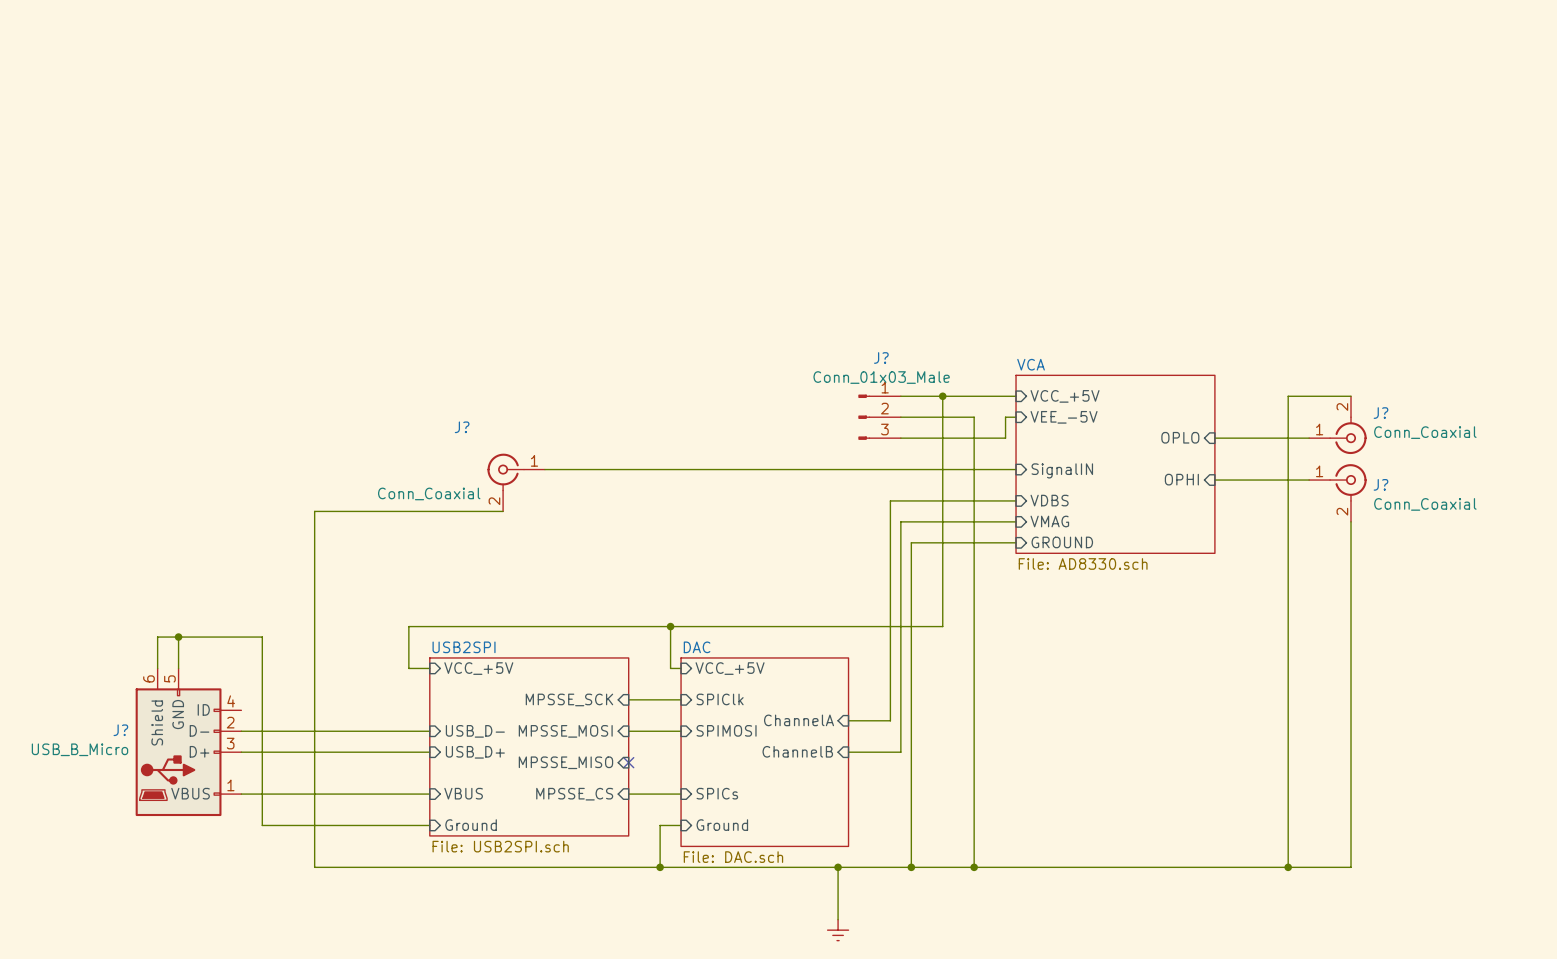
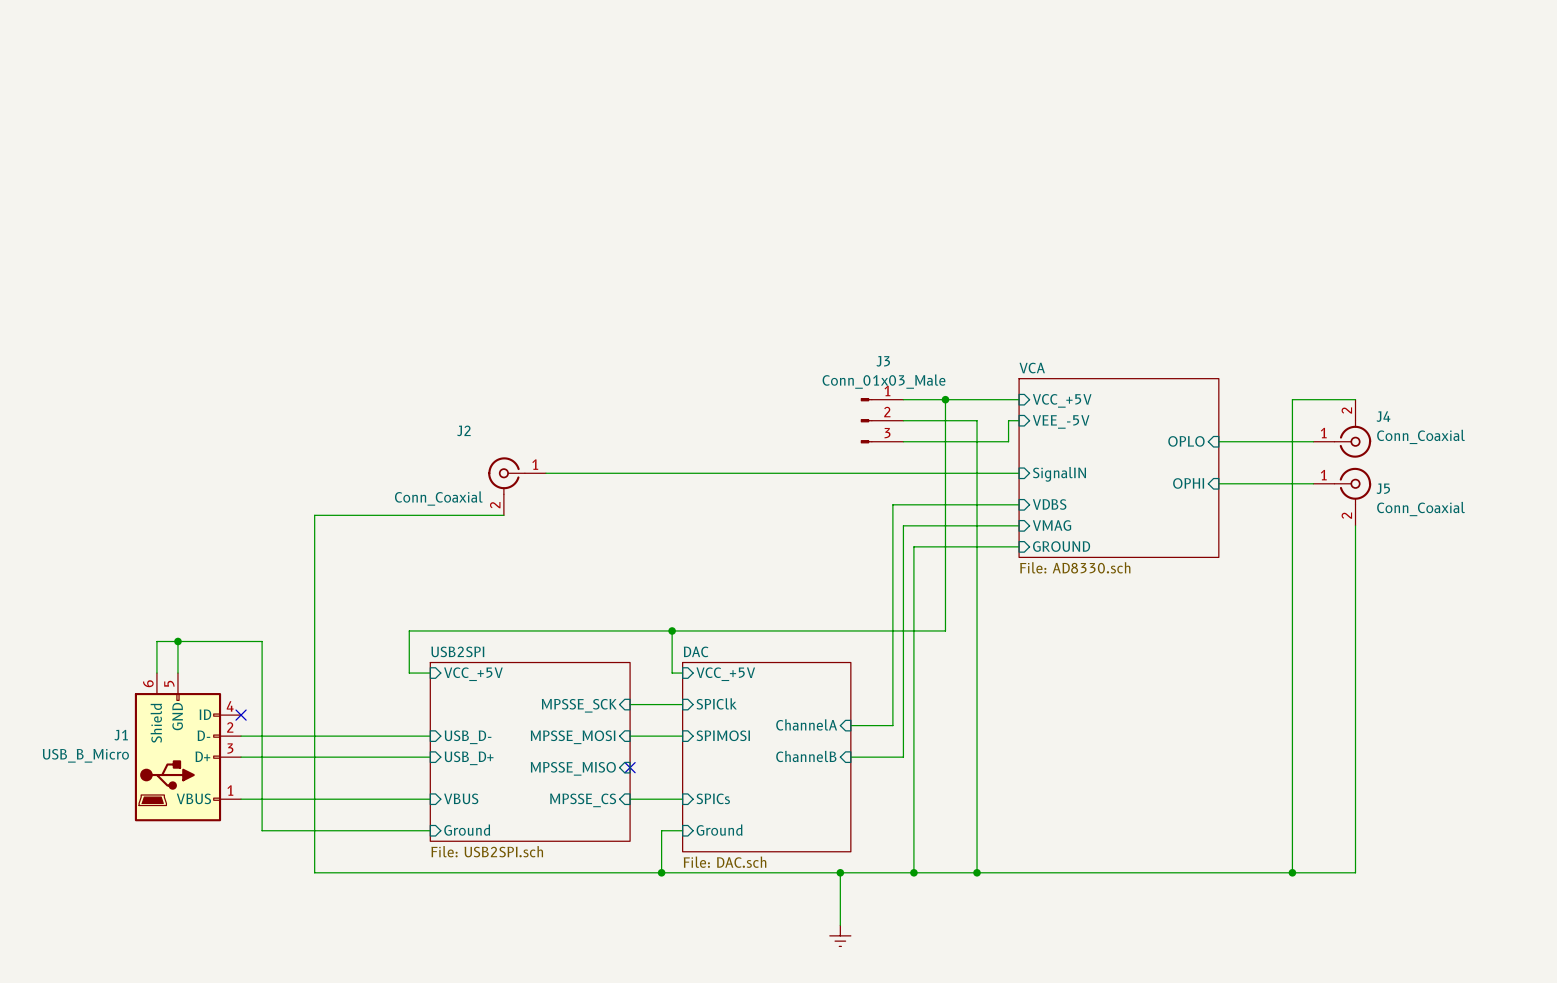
J? name: J? (881, 357) -> J3 (883, 361)
J? name: J? (1380, 413) -> J4 (1383, 416)
J? name: J? (462, 427) -> J2 (463, 430)
J? name: J? (1380, 484) -> J5 (1383, 488)
no-connect mark: none -> (241, 715)
J? name: J? (120, 730) -> J1 (121, 735)

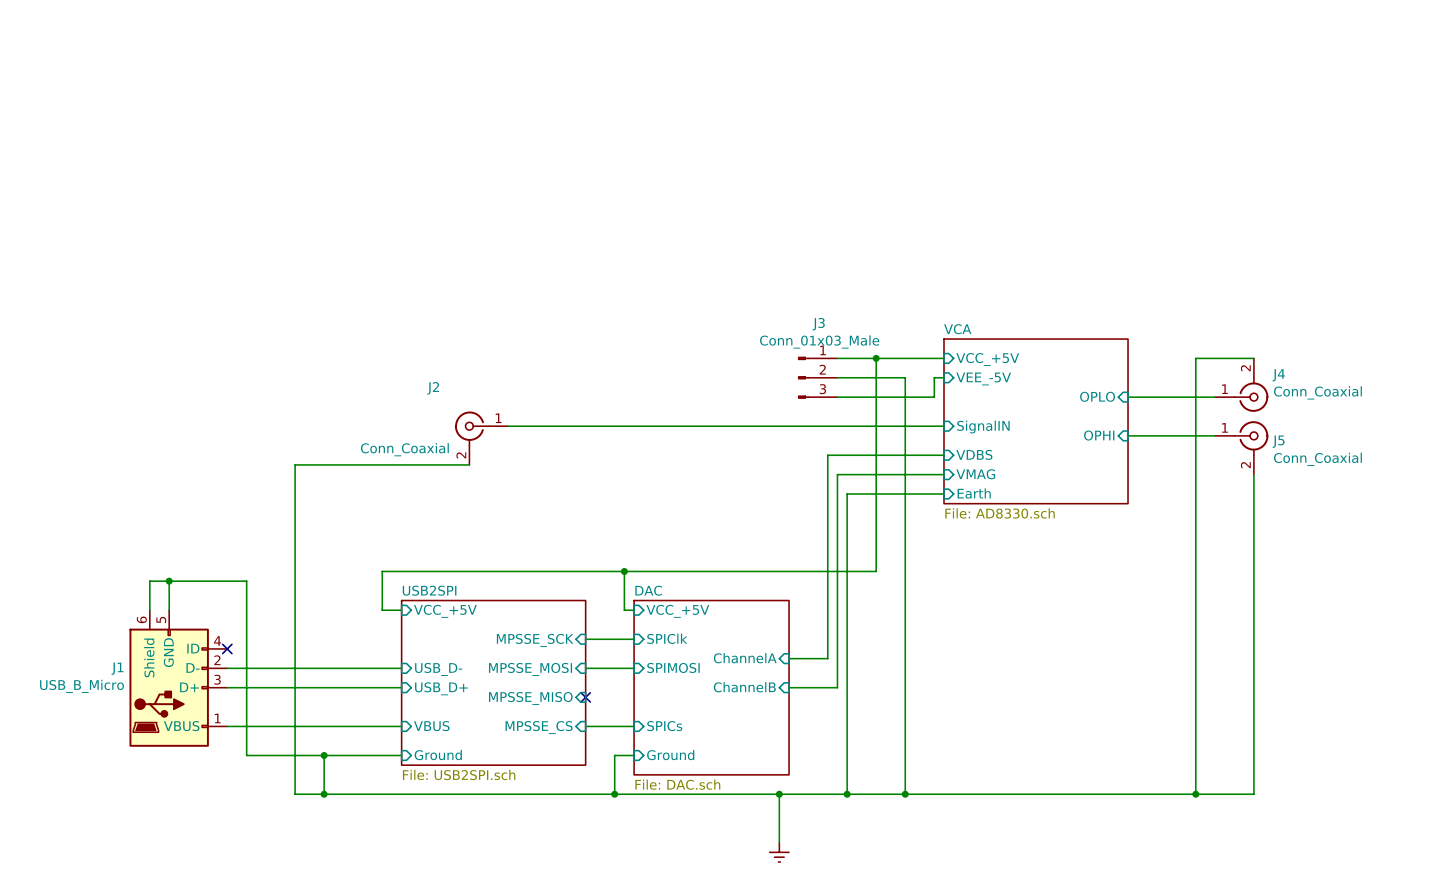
sheet pin: GROUND (1061, 546) -> Earth (974, 493)
wire: none -> (324, 755) (324, 794)
junction: none -> (324, 755)
junction: none -> (324, 794)

